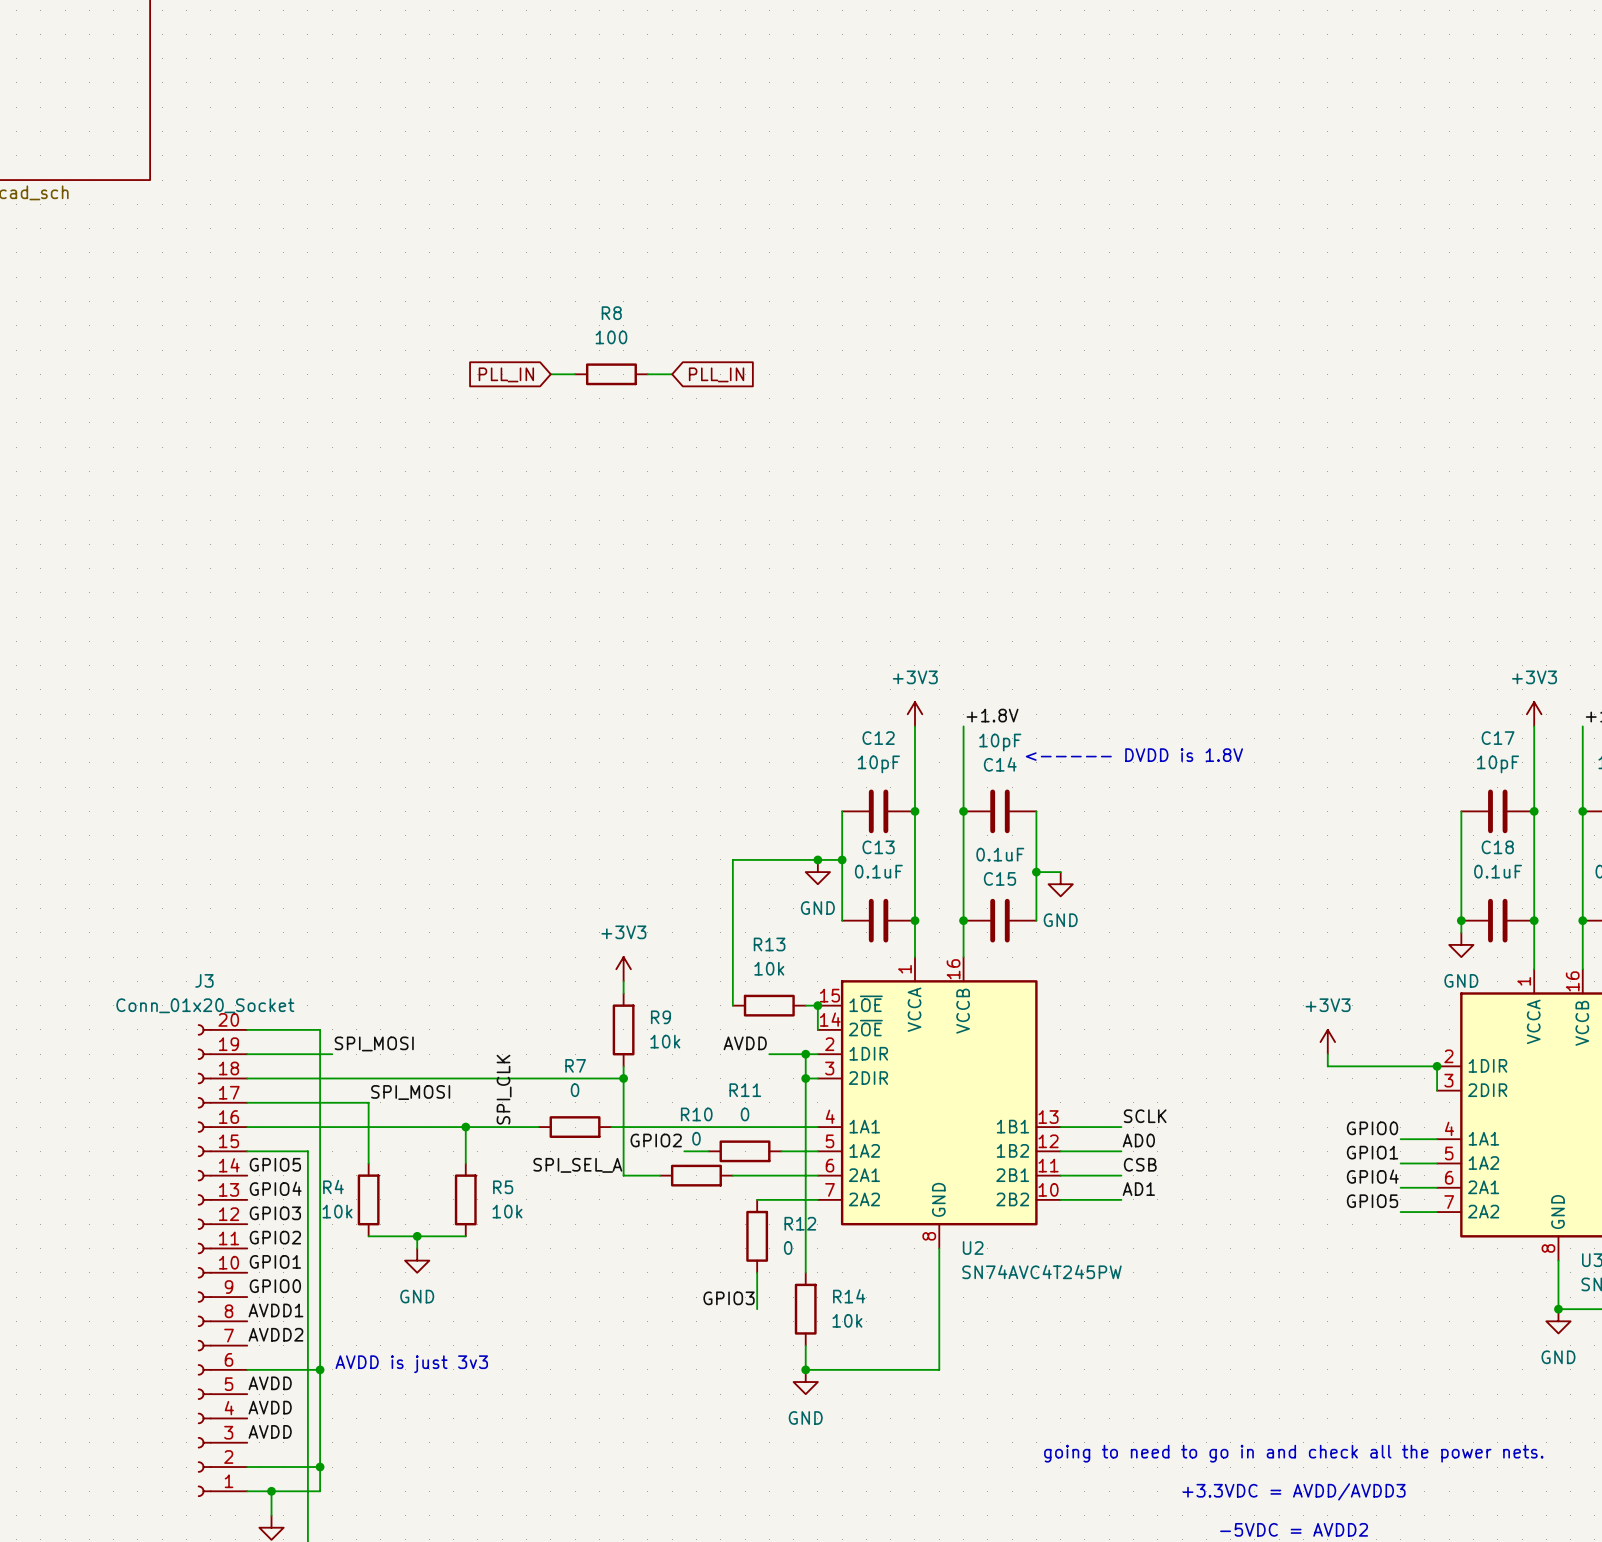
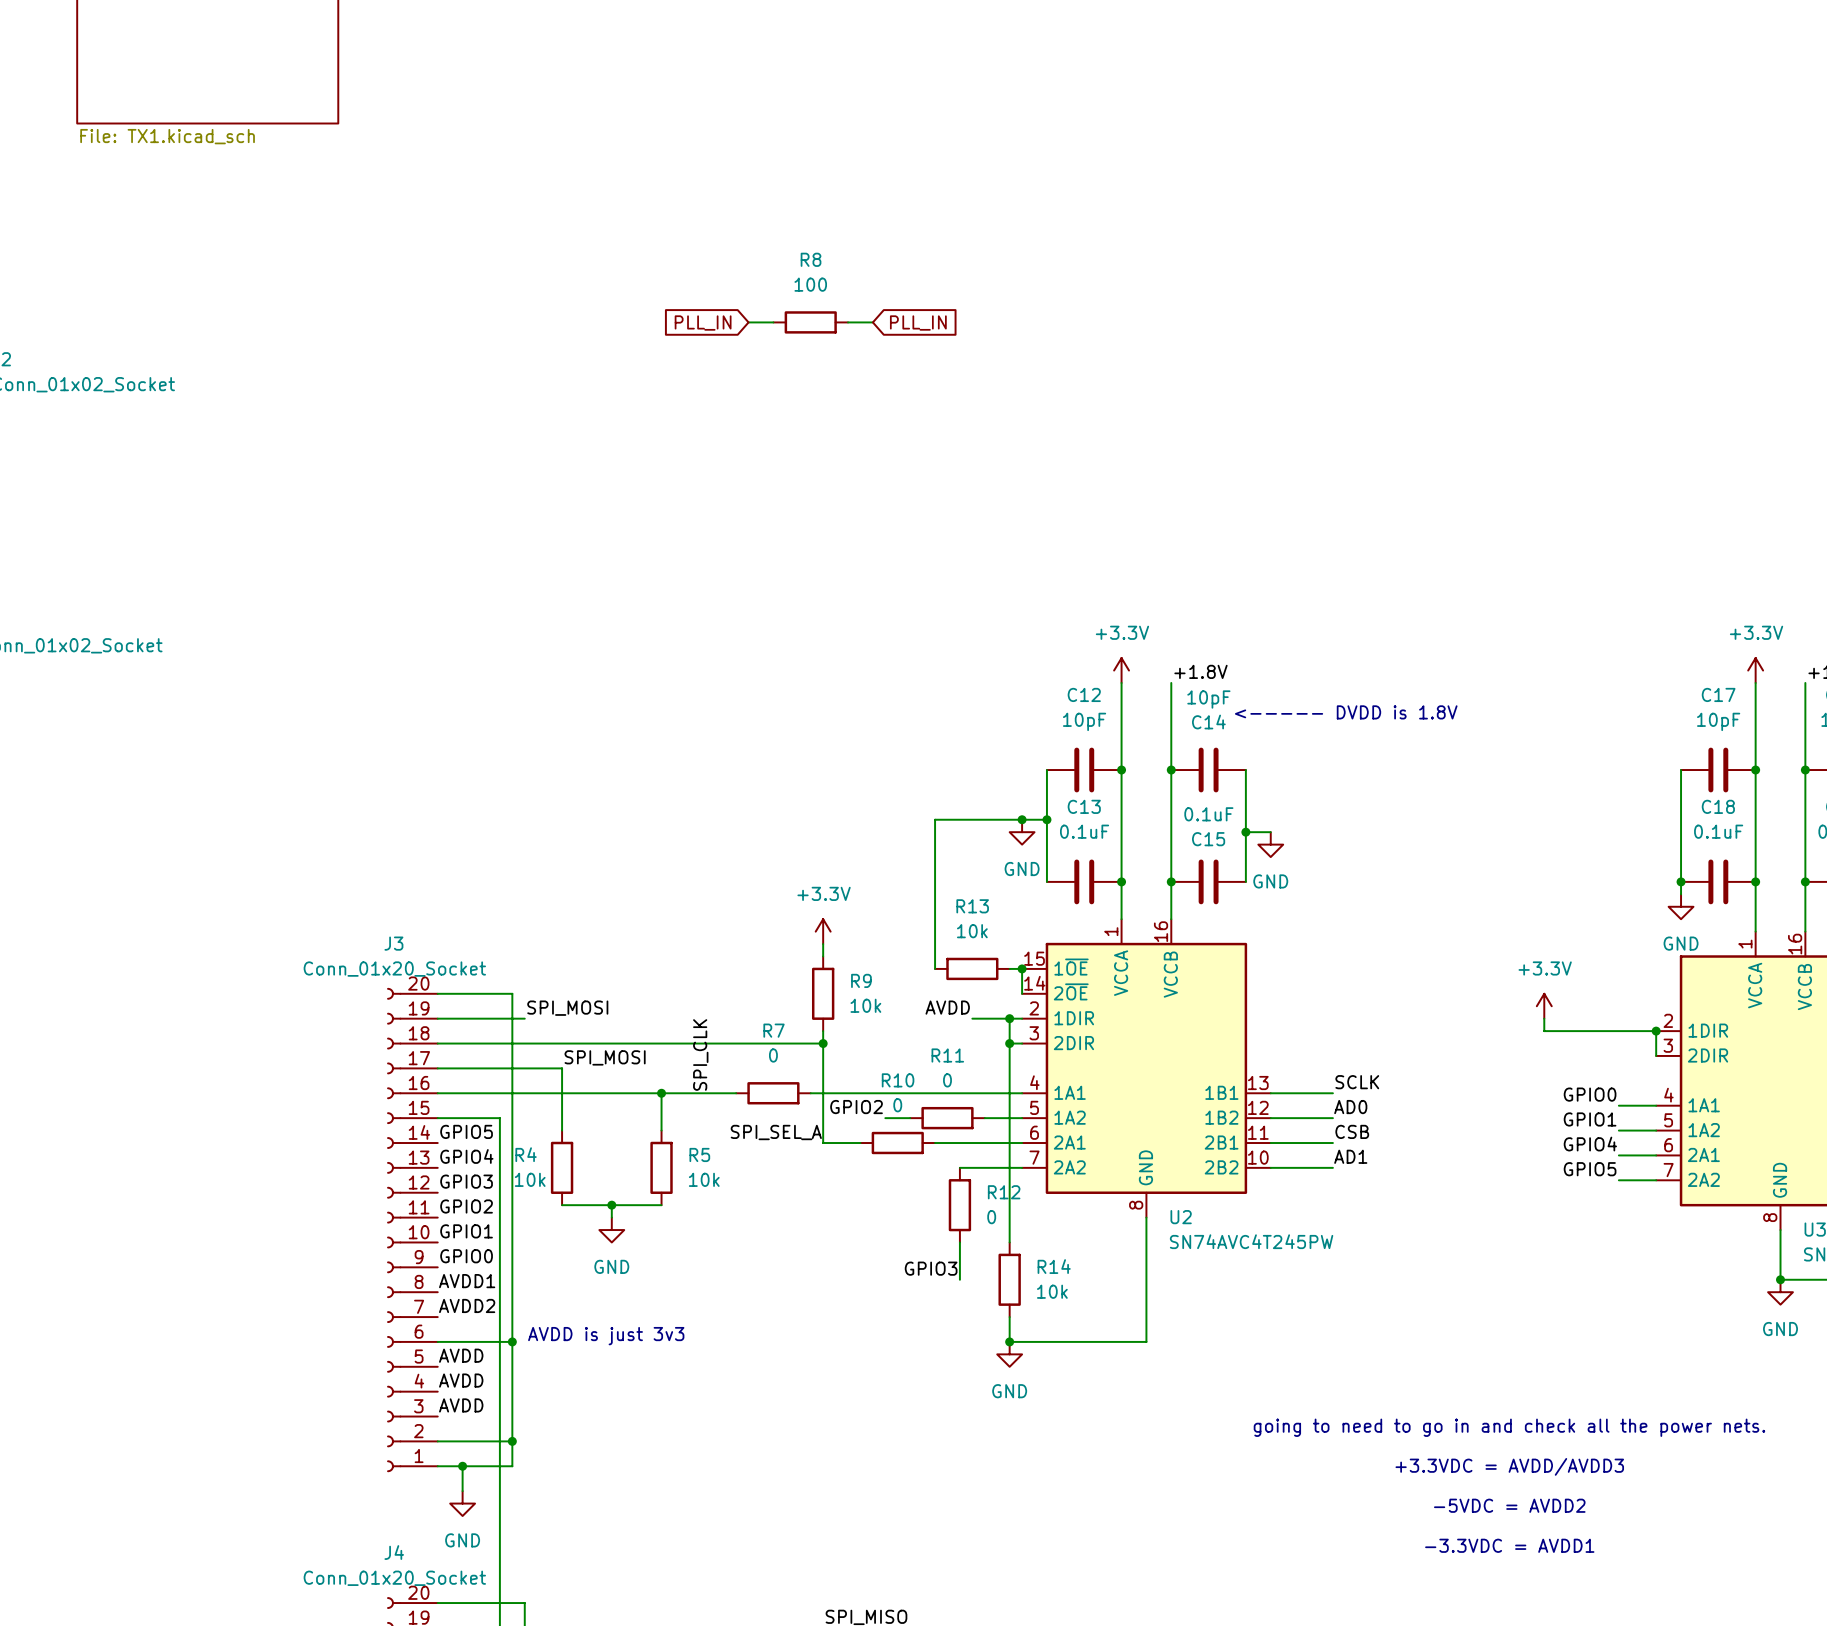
power symbol: +3V3 (914, 714) -> +3.3V (1121, 670)
power symbol: +3V3 (1534, 714) -> +3.3V (1755, 670)
power symbol: +3V3 (623, 969) -> +3.3V (823, 931)
power symbol: +3V3 (1327, 1042) -> +3.3V (1544, 1006)

